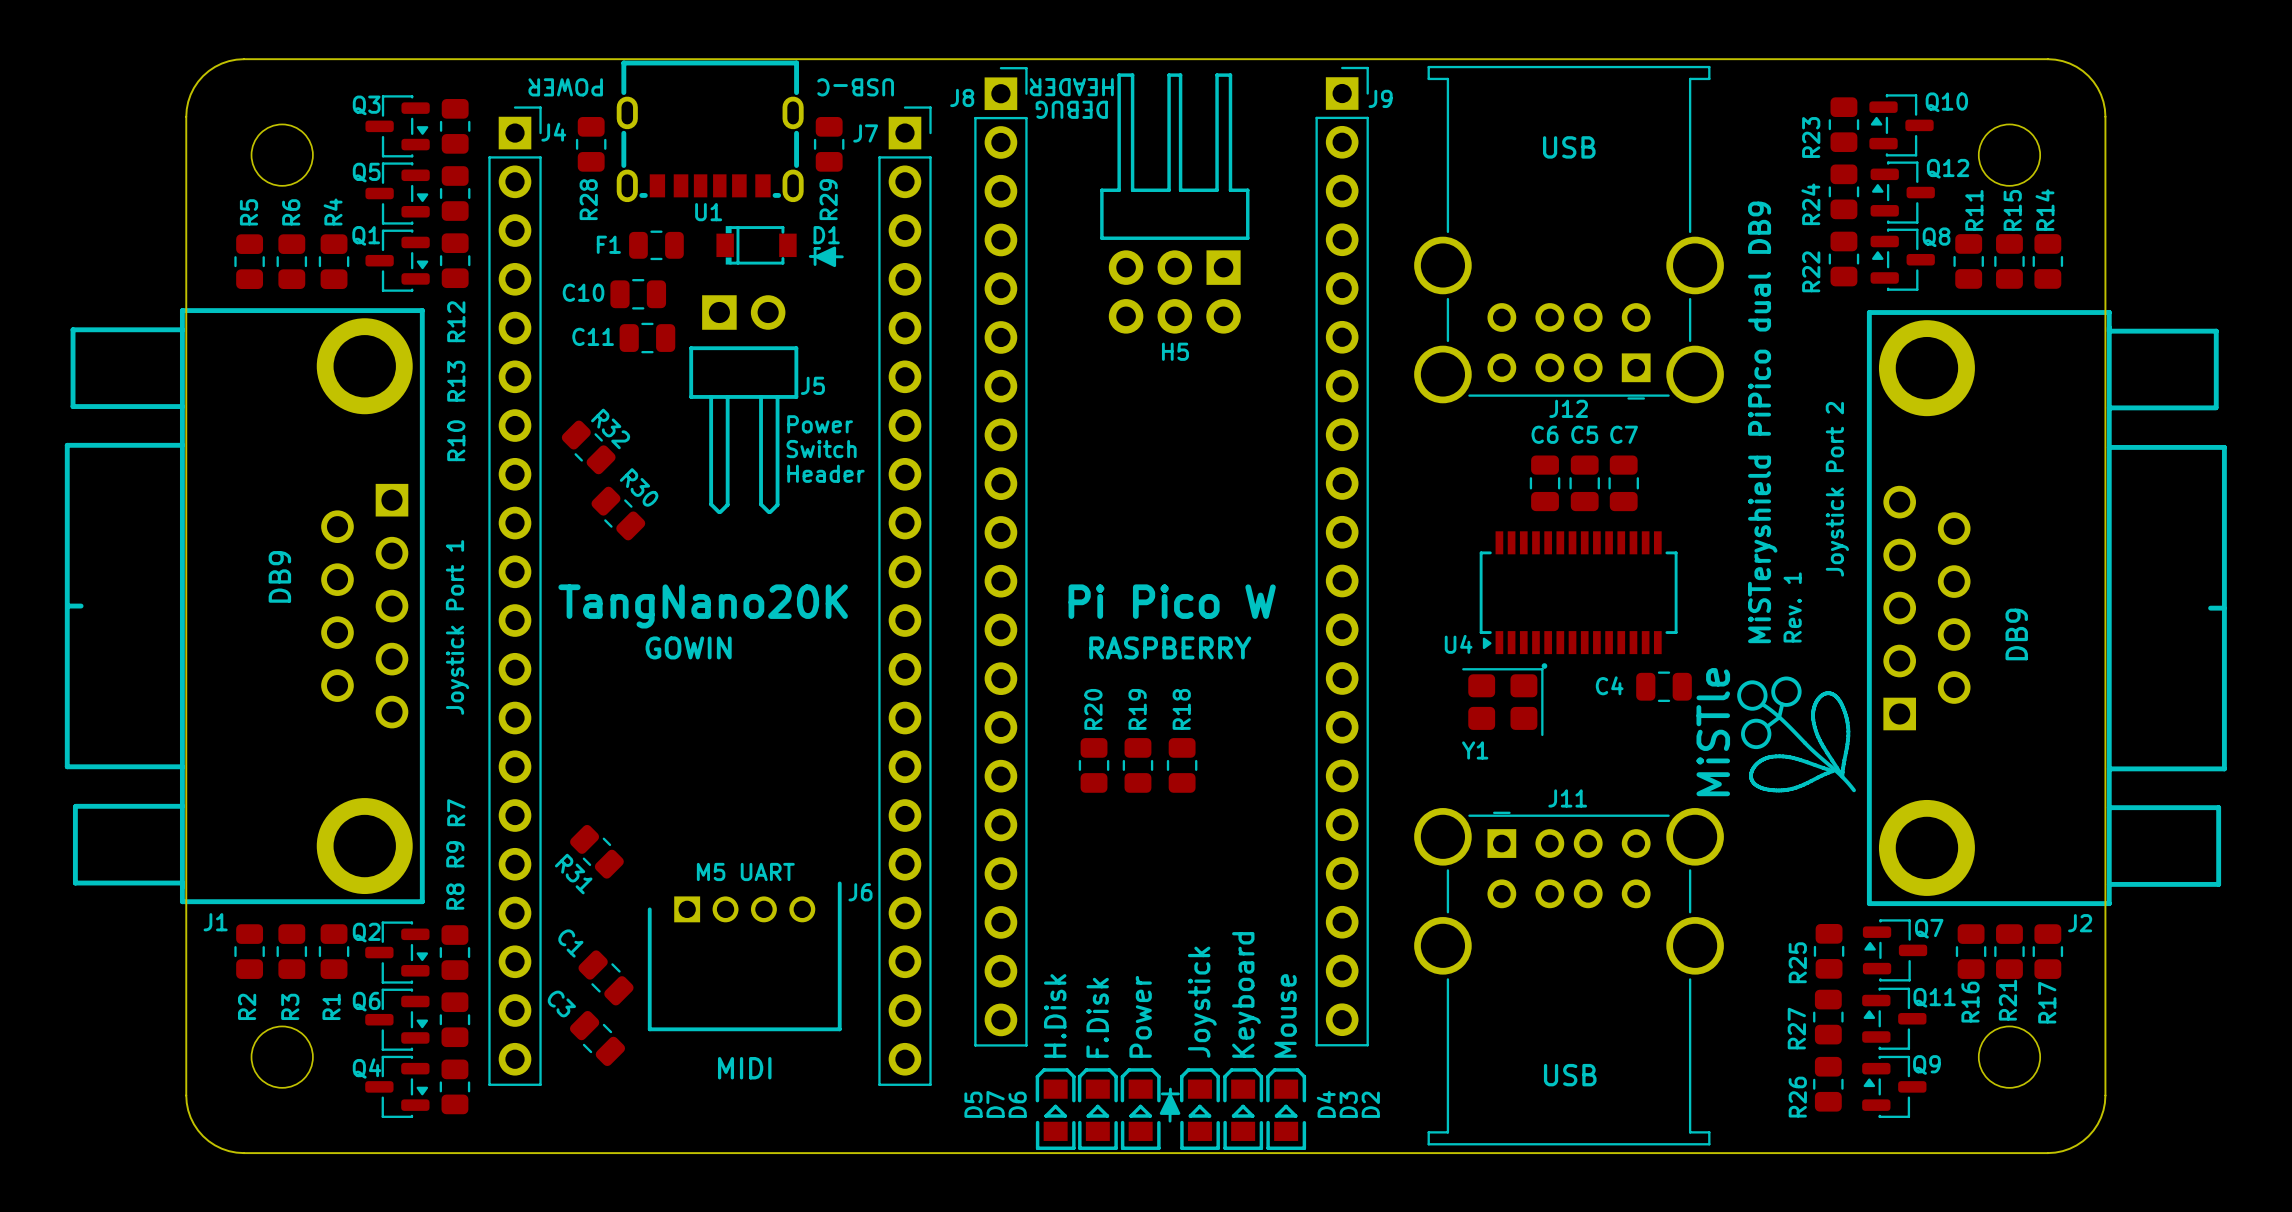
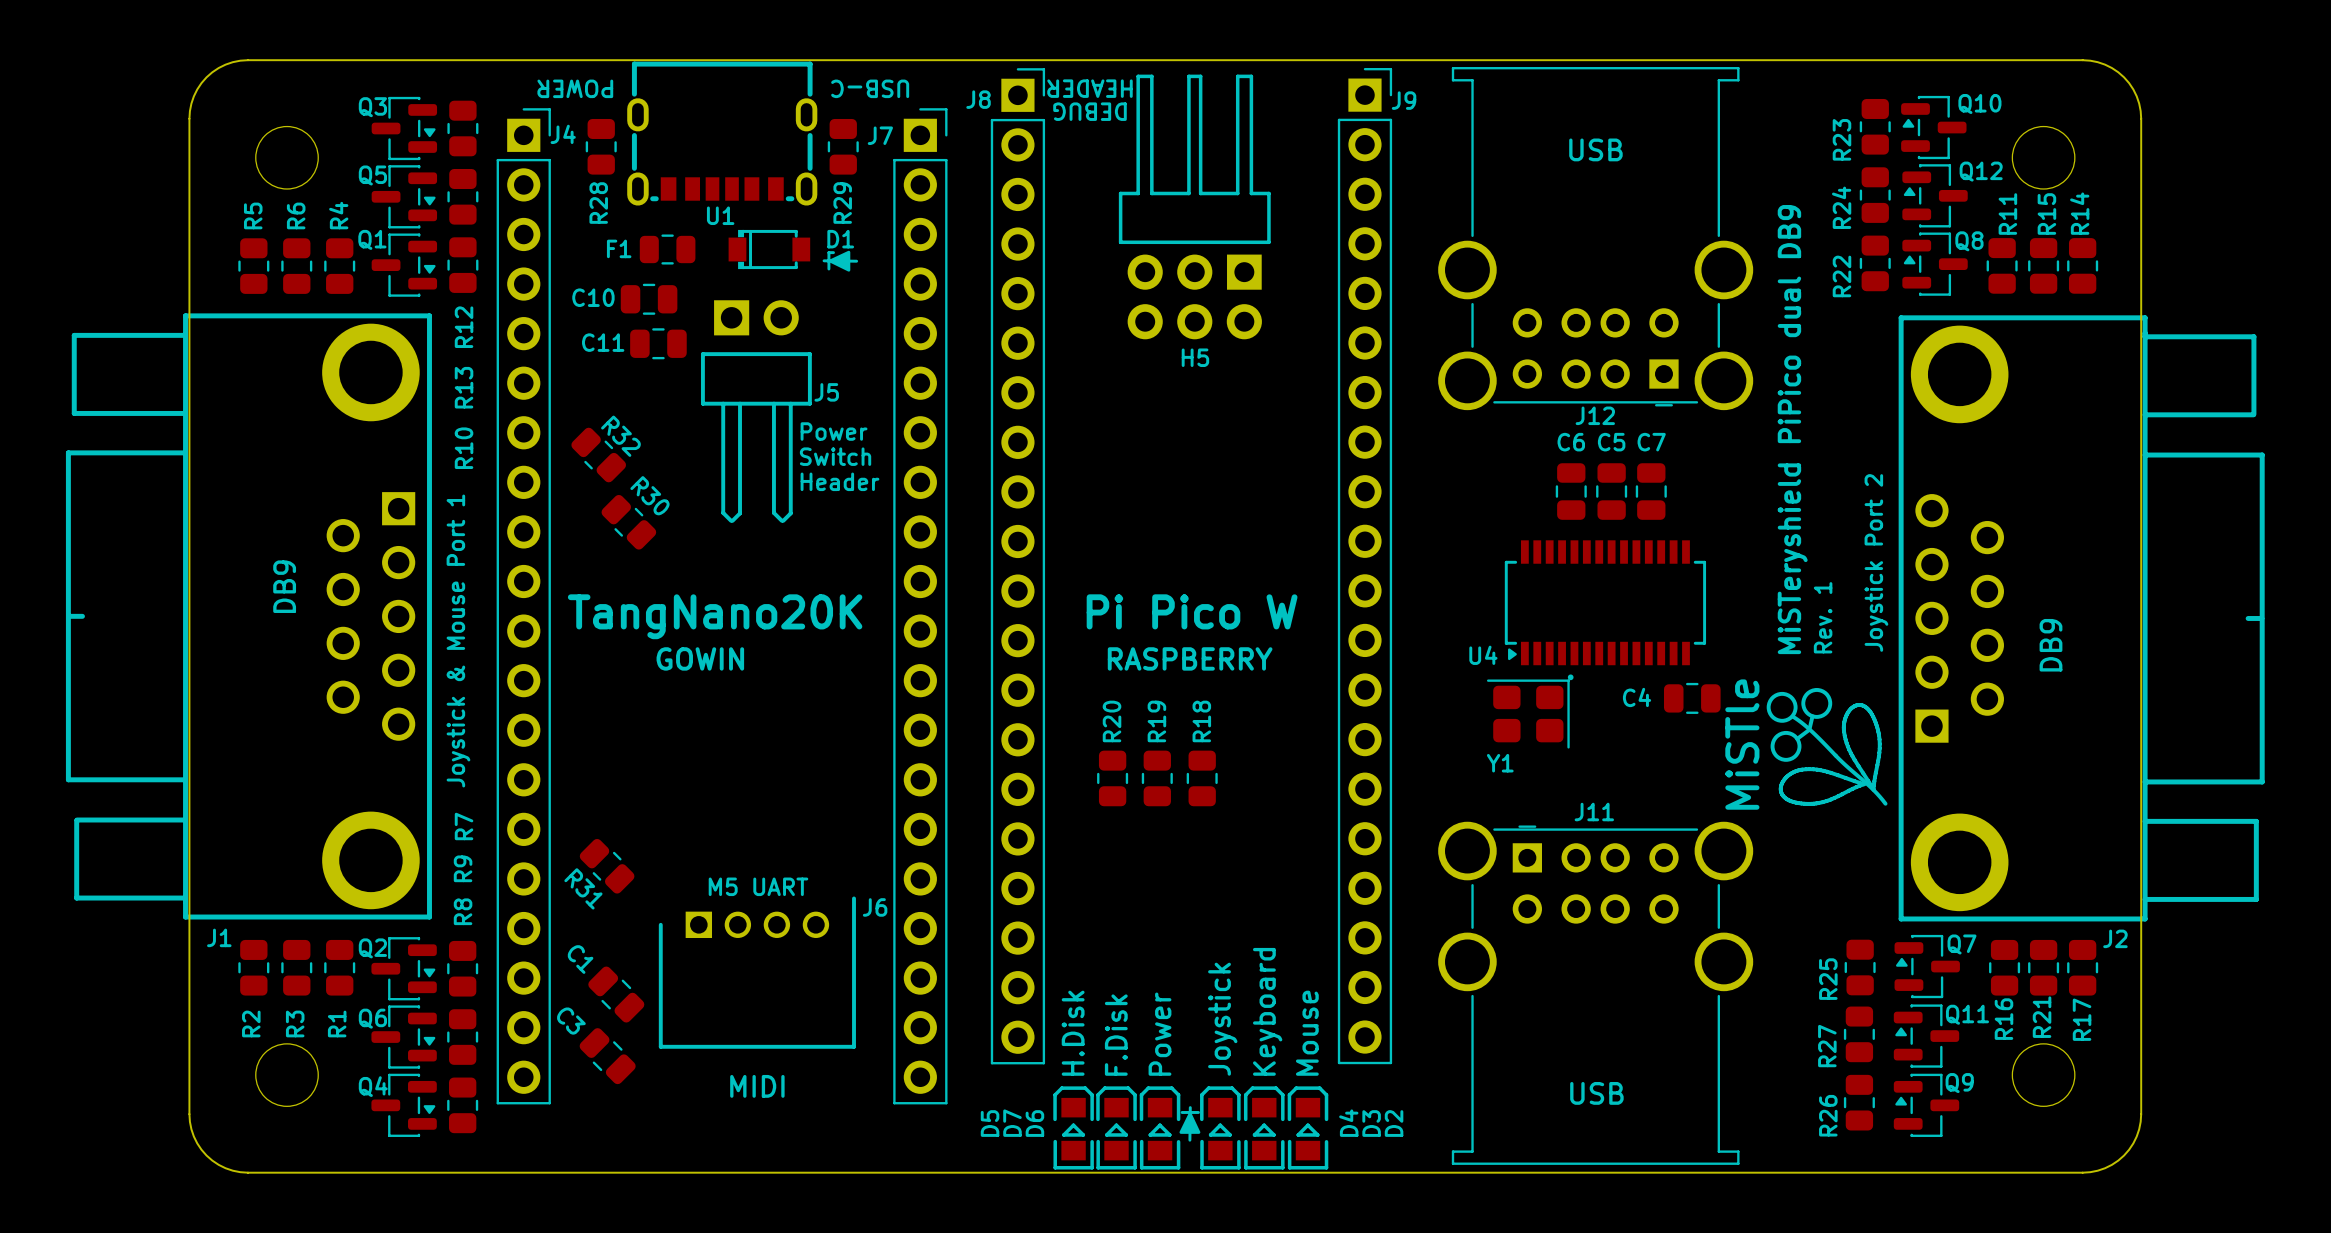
text position: Joystick Port 2 (1837, 489) -> Joystick Port 2 (1876, 562)
text: Joystick Port 1 (457, 627) -> Joystick & Mouse Port 1 (458, 641)

